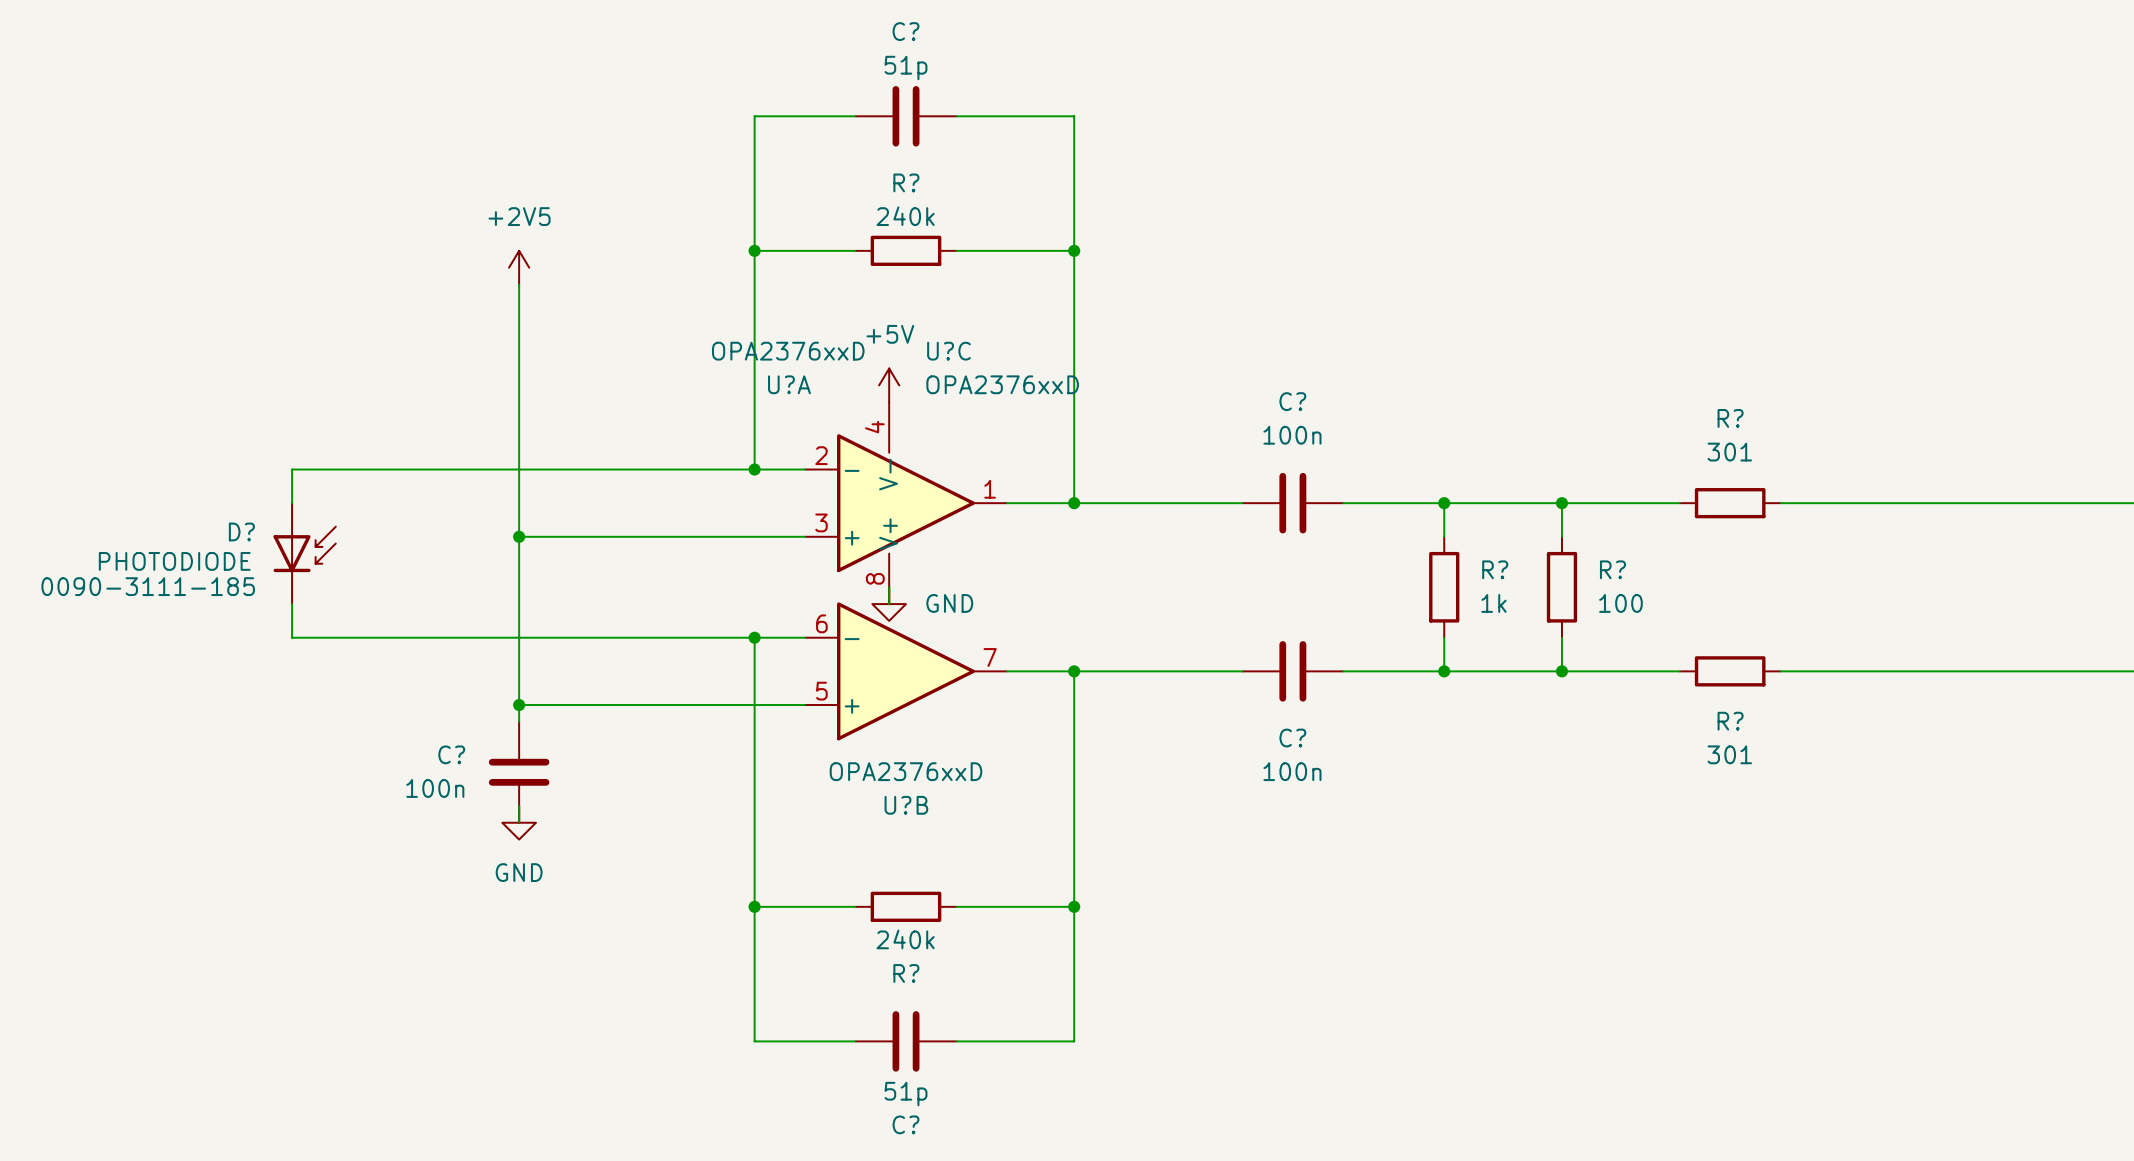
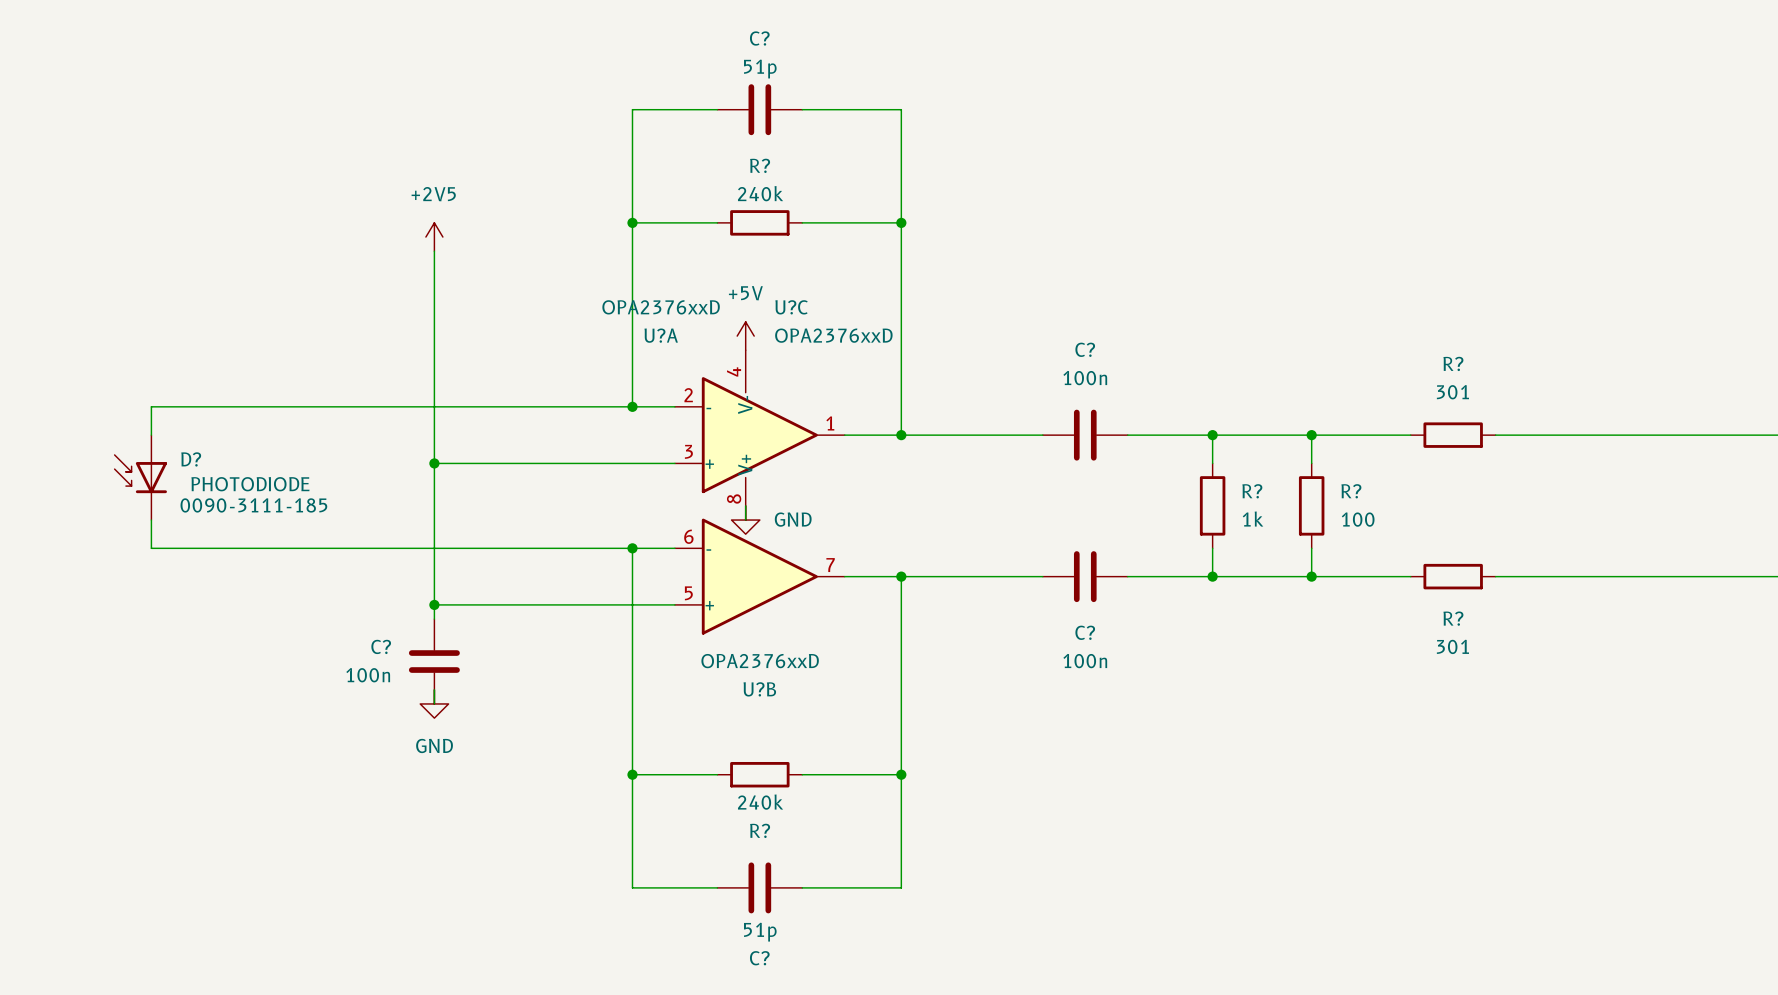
wire: (292, 469) (292, 503) -> (243, 406) (151, 406) (151, 435)
D?: none -> 0090-3111-185 (140, 477)
D?: 0090-3111-185 (304, 553) -> none
wire: (292, 604) (292, 637) -> (151, 520) (151, 548) (243, 548)

